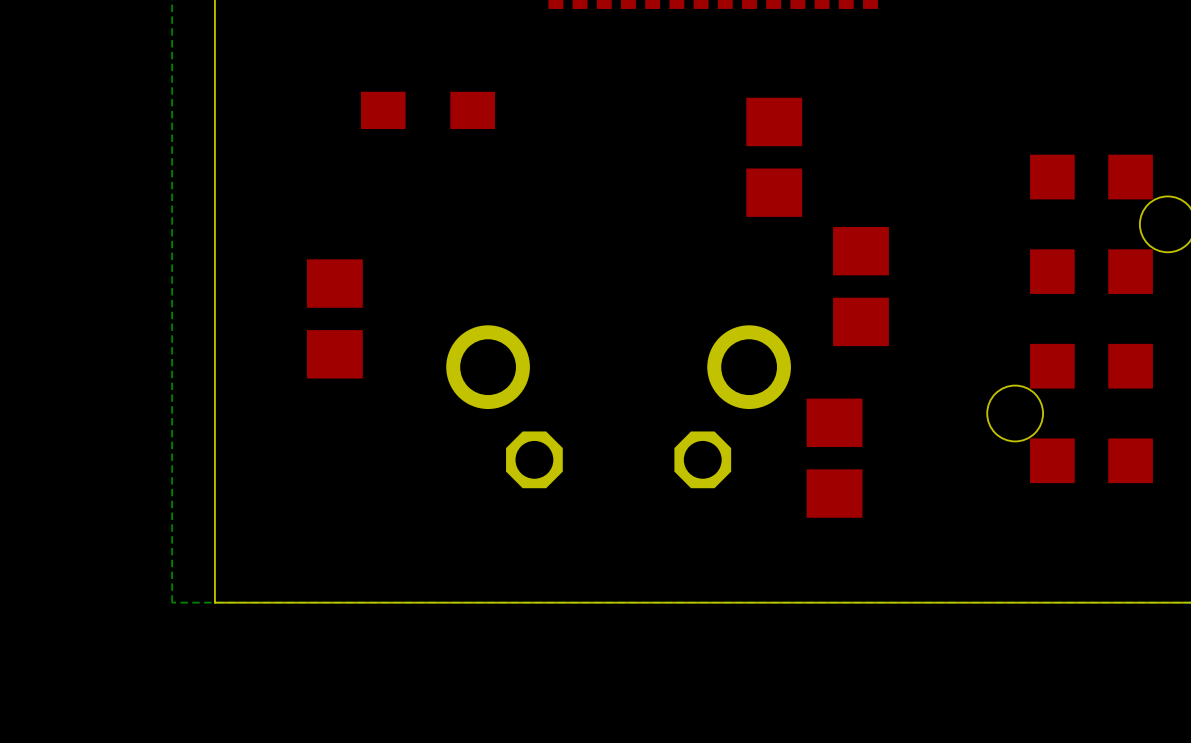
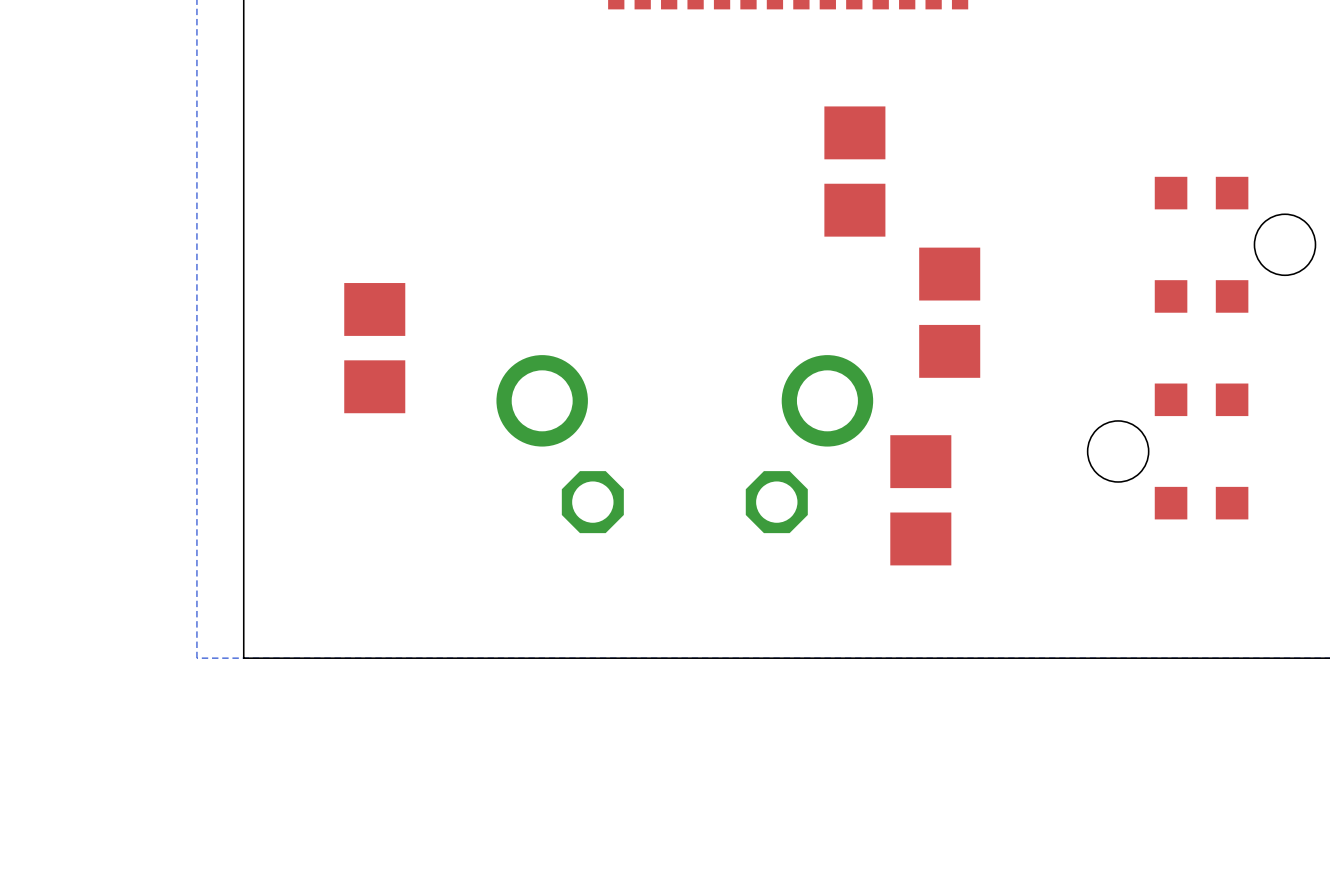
part: (427, 110) -> none
part footprint: [1030, 154, 1153, 200] -> [1154, 176, 1249, 210]
part footprint: [1030, 249, 1153, 294] -> [1154, 280, 1249, 313]
part footprint: [1030, 343, 1153, 389] -> [1154, 383, 1249, 417]
part footprint: [1030, 438, 1153, 484] -> [1154, 486, 1249, 520]

